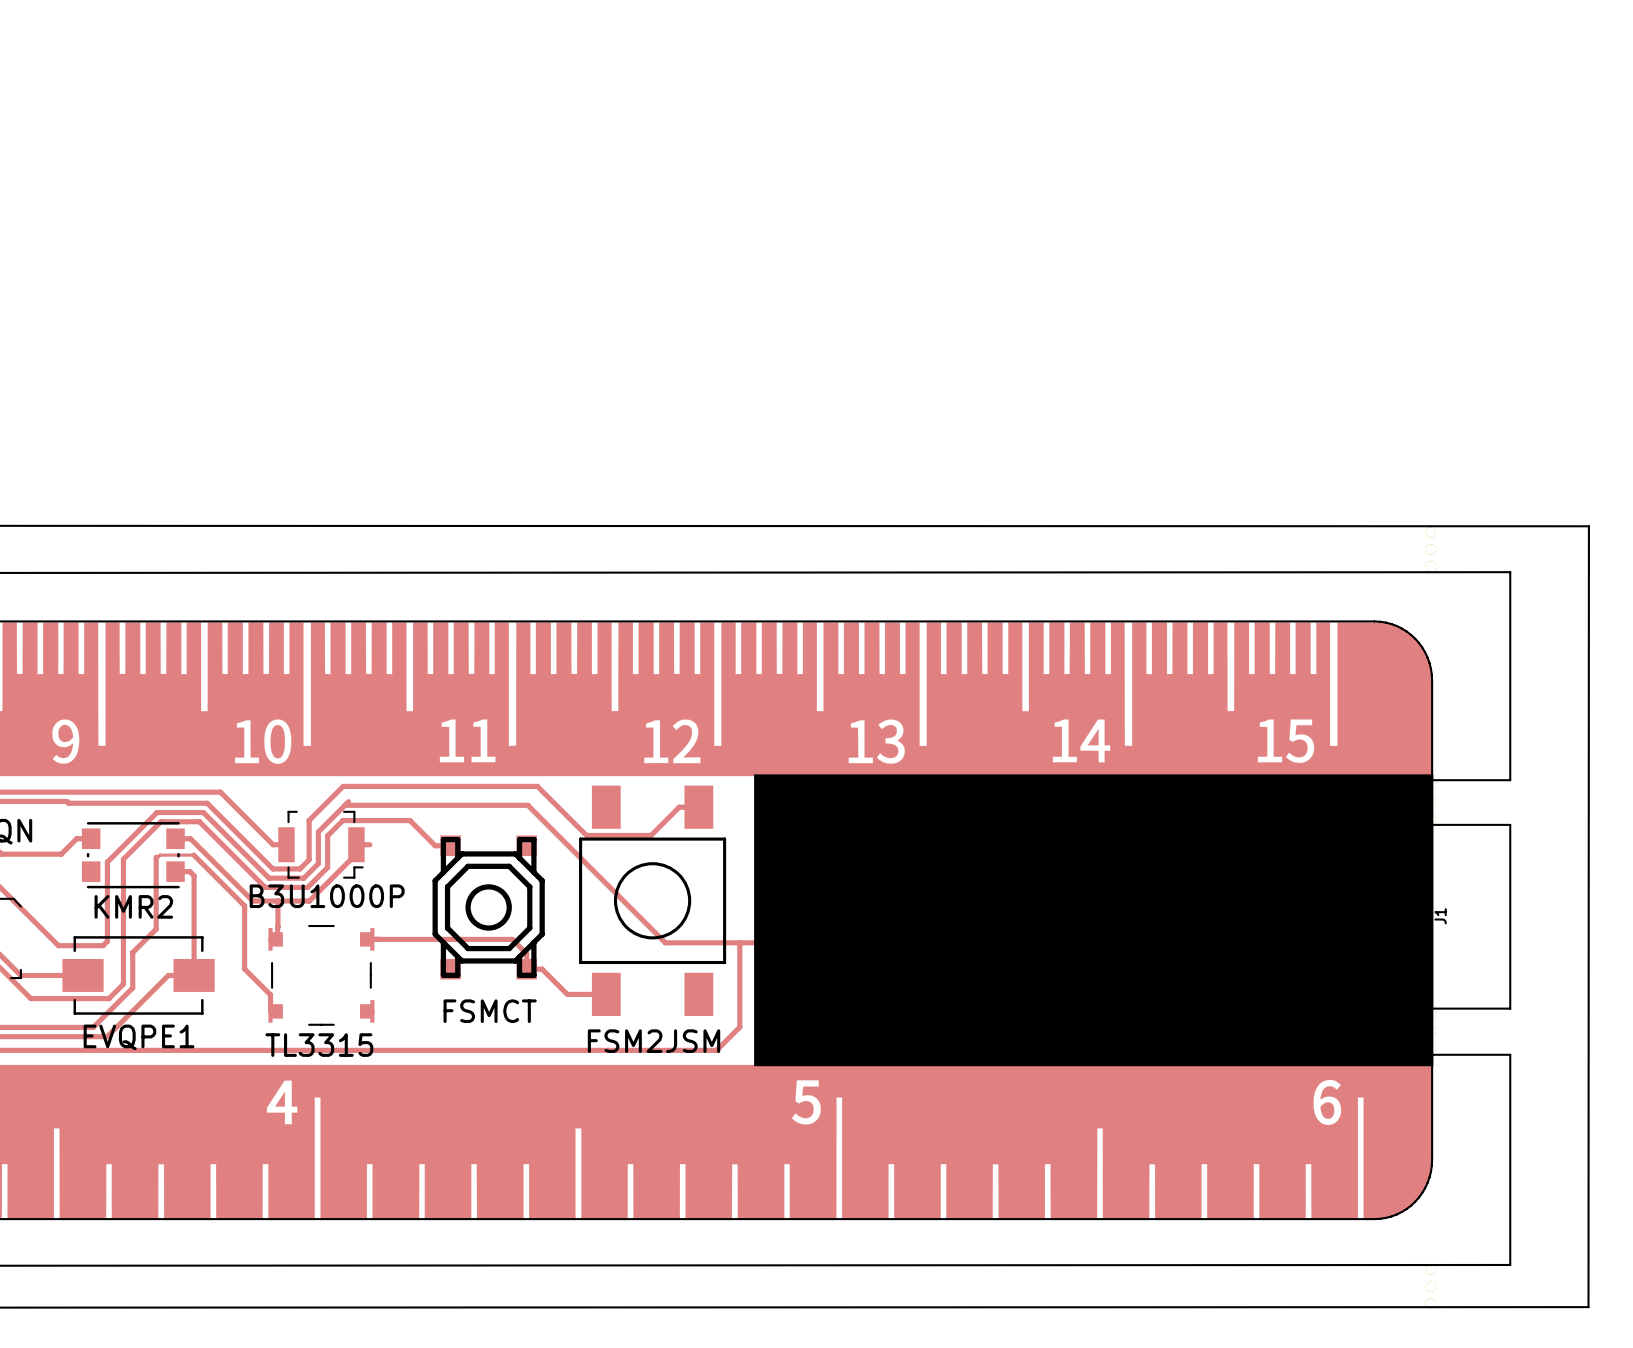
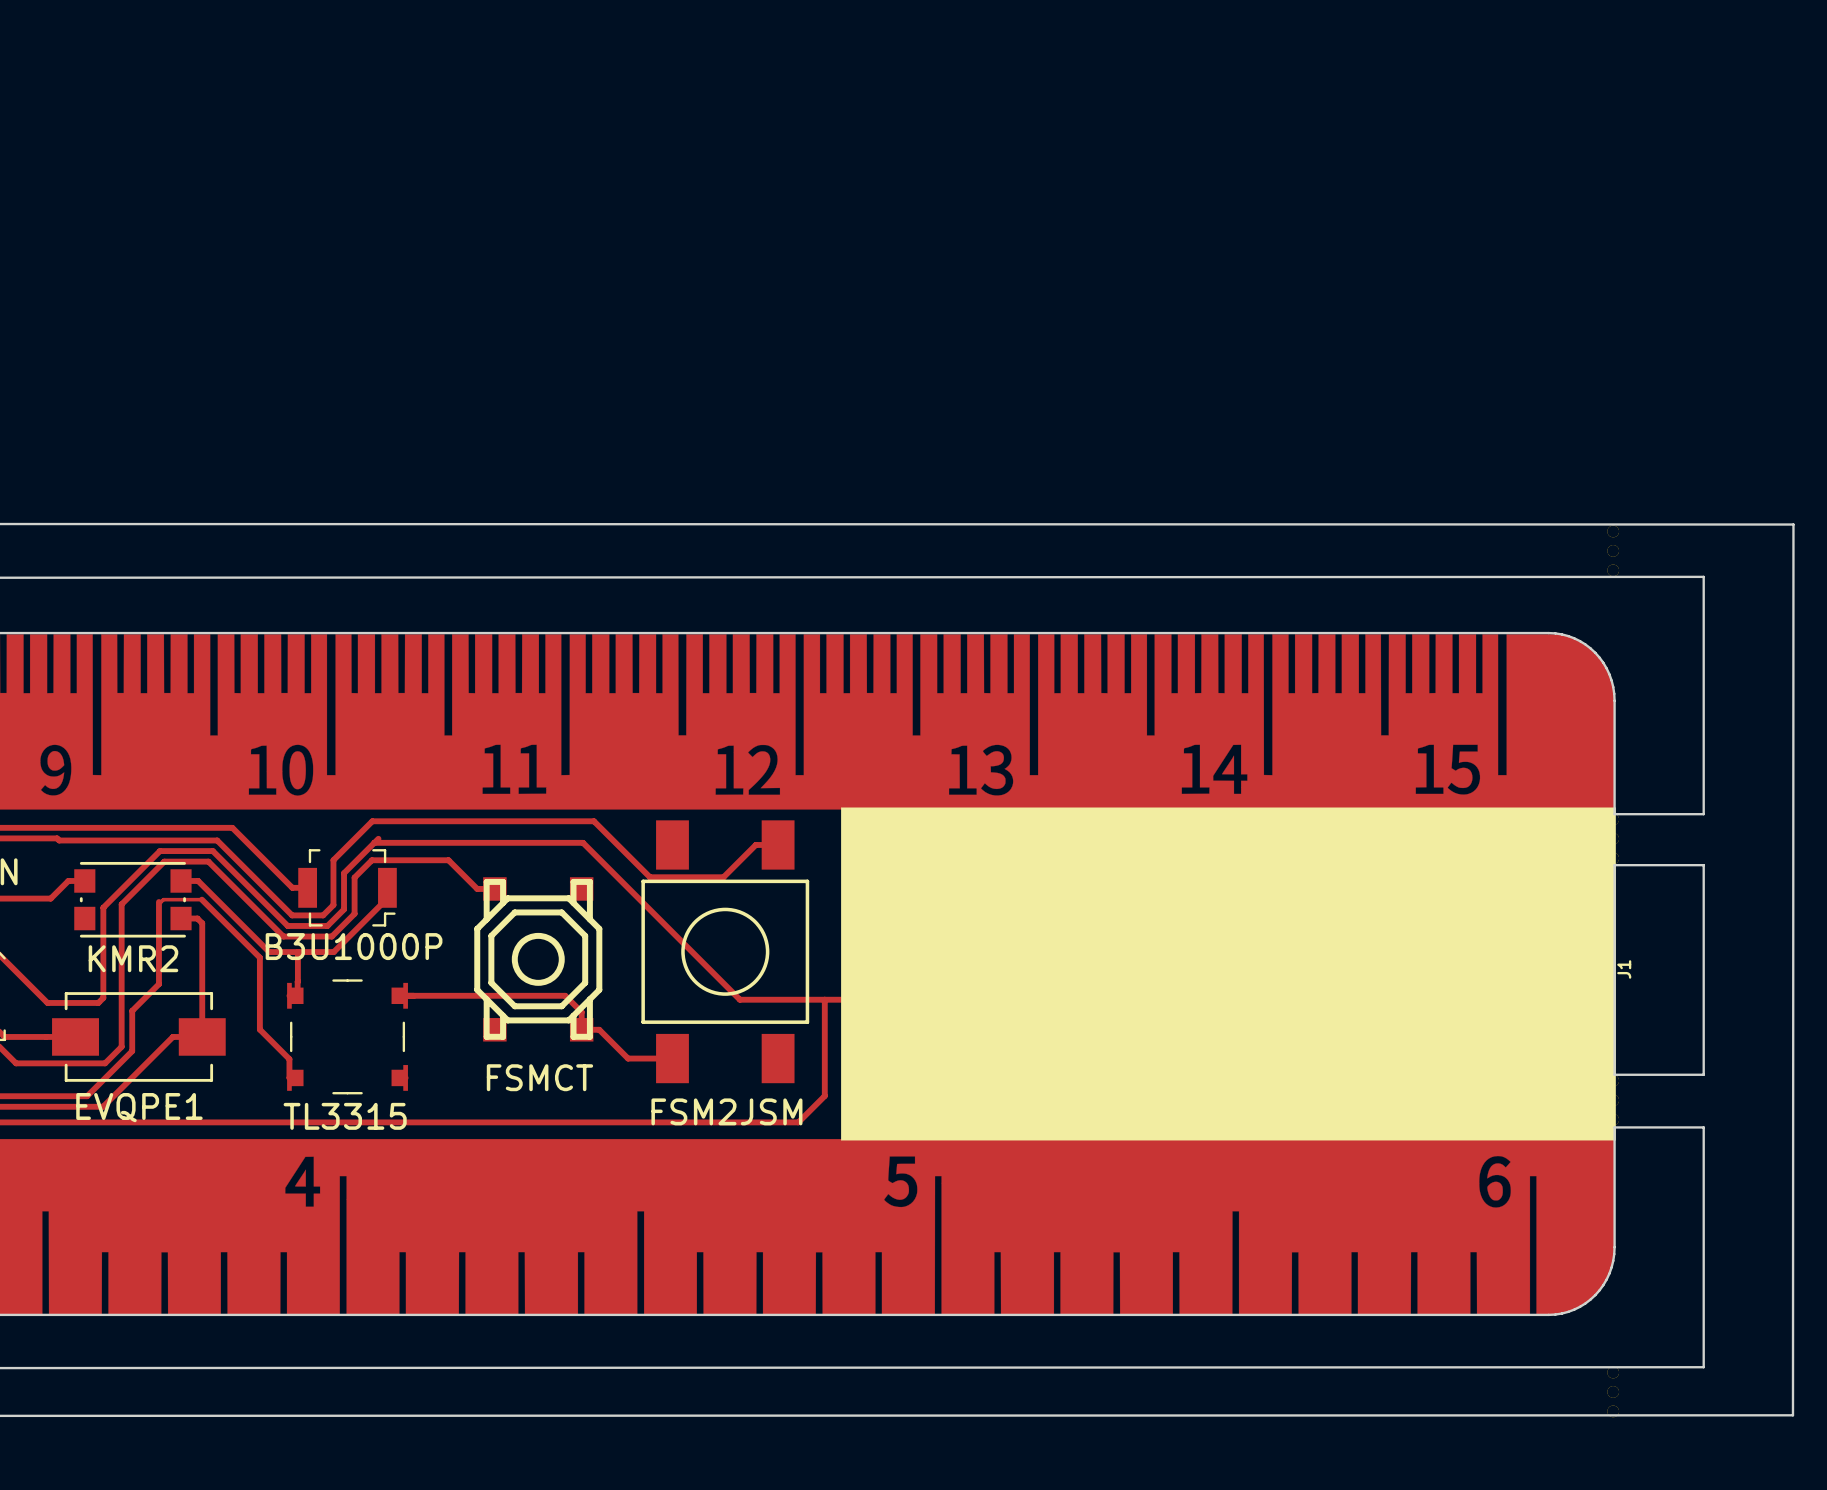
track: (356, 844) (369, 844) -> none

